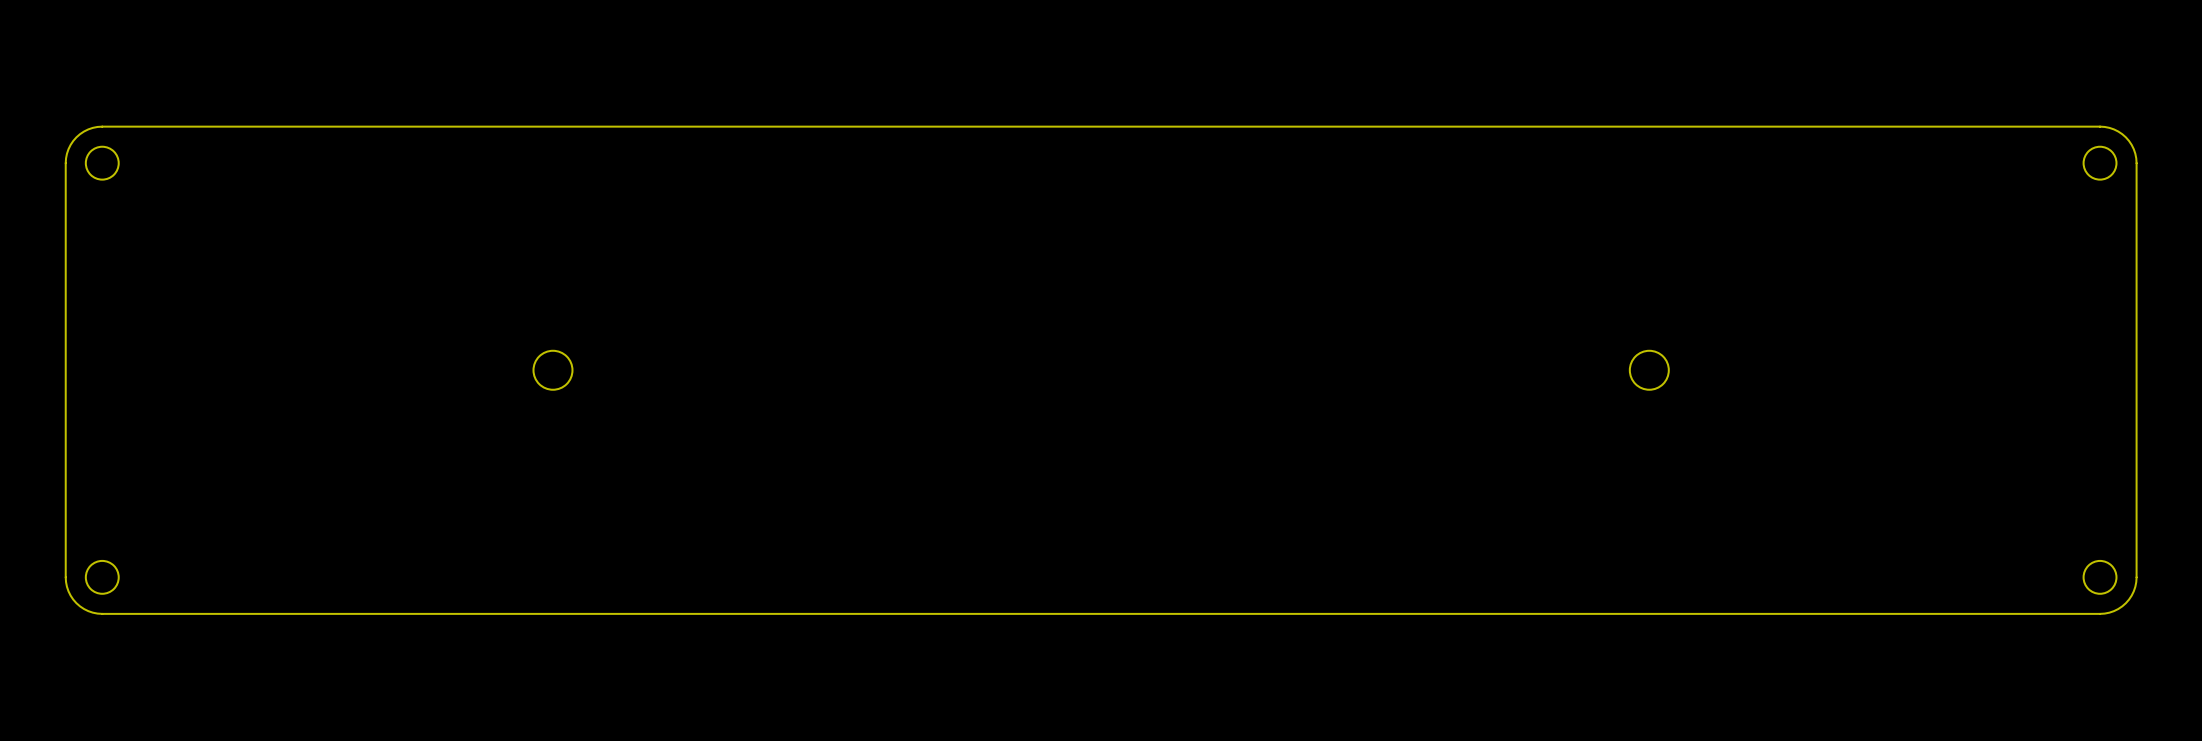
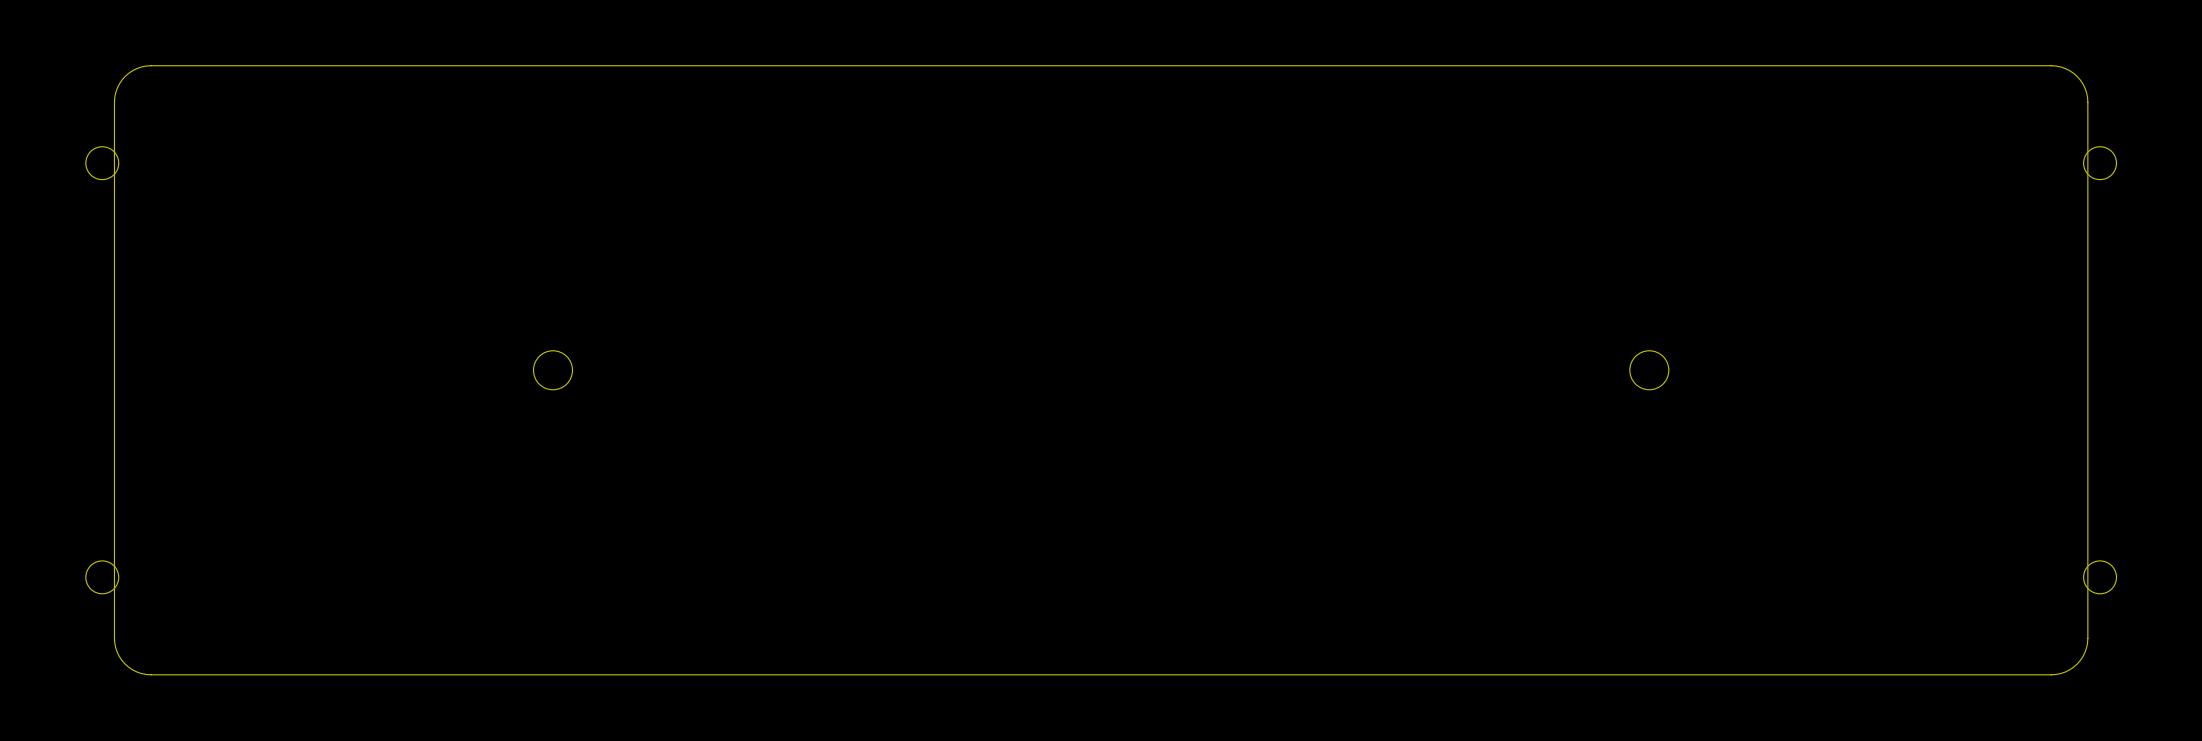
board edge: (2100, 126) (92, 127) (84, 131) (73, 140) (68, 149) (65, 163) (66, 586) (73, 599) (80, 606) (92, 612) (102, 613) (2109, 612) (2118, 609) (2129, 599) (2135, 586) (2136, 577) (2136, 163) (2133, 149) (2125, 137) (2114, 129) (2100, 126) -> (2051, 65) (2065, 68) (2077, 76) (2085, 88) (2087, 102) (2087, 638) (2086, 647) (2080, 660) (2069, 669) (2060, 673) (151, 674) (141, 673) (128, 667) (122, 660) (115, 647) (114, 102) (117, 88) (122, 80) (128, 73) (141, 66) (2051, 65)

